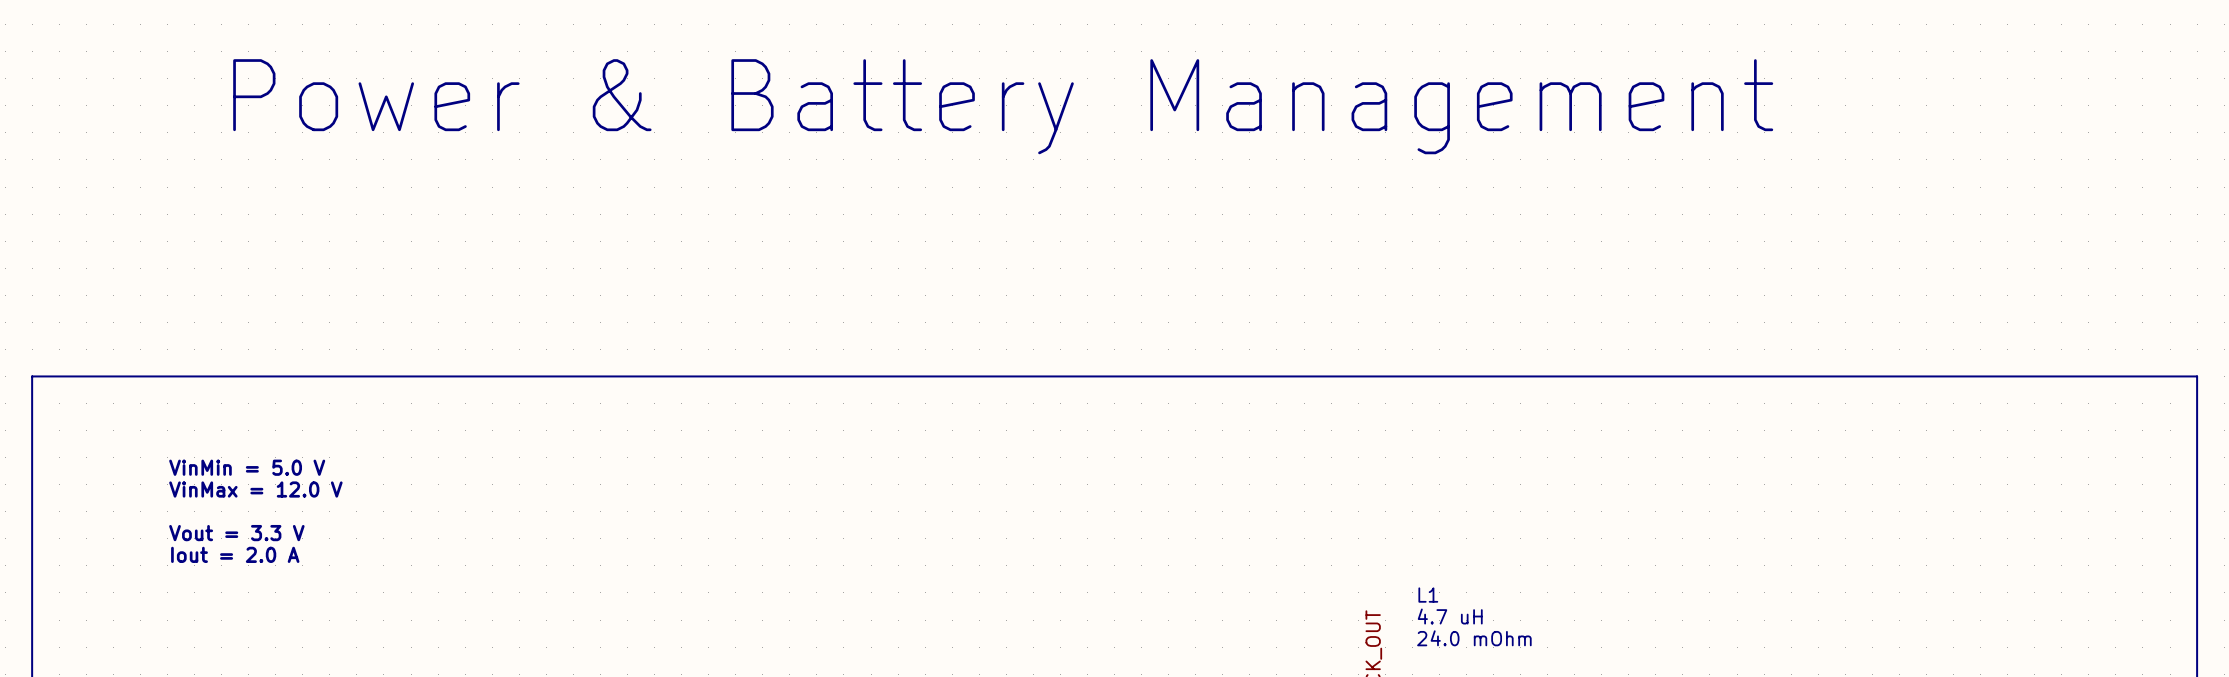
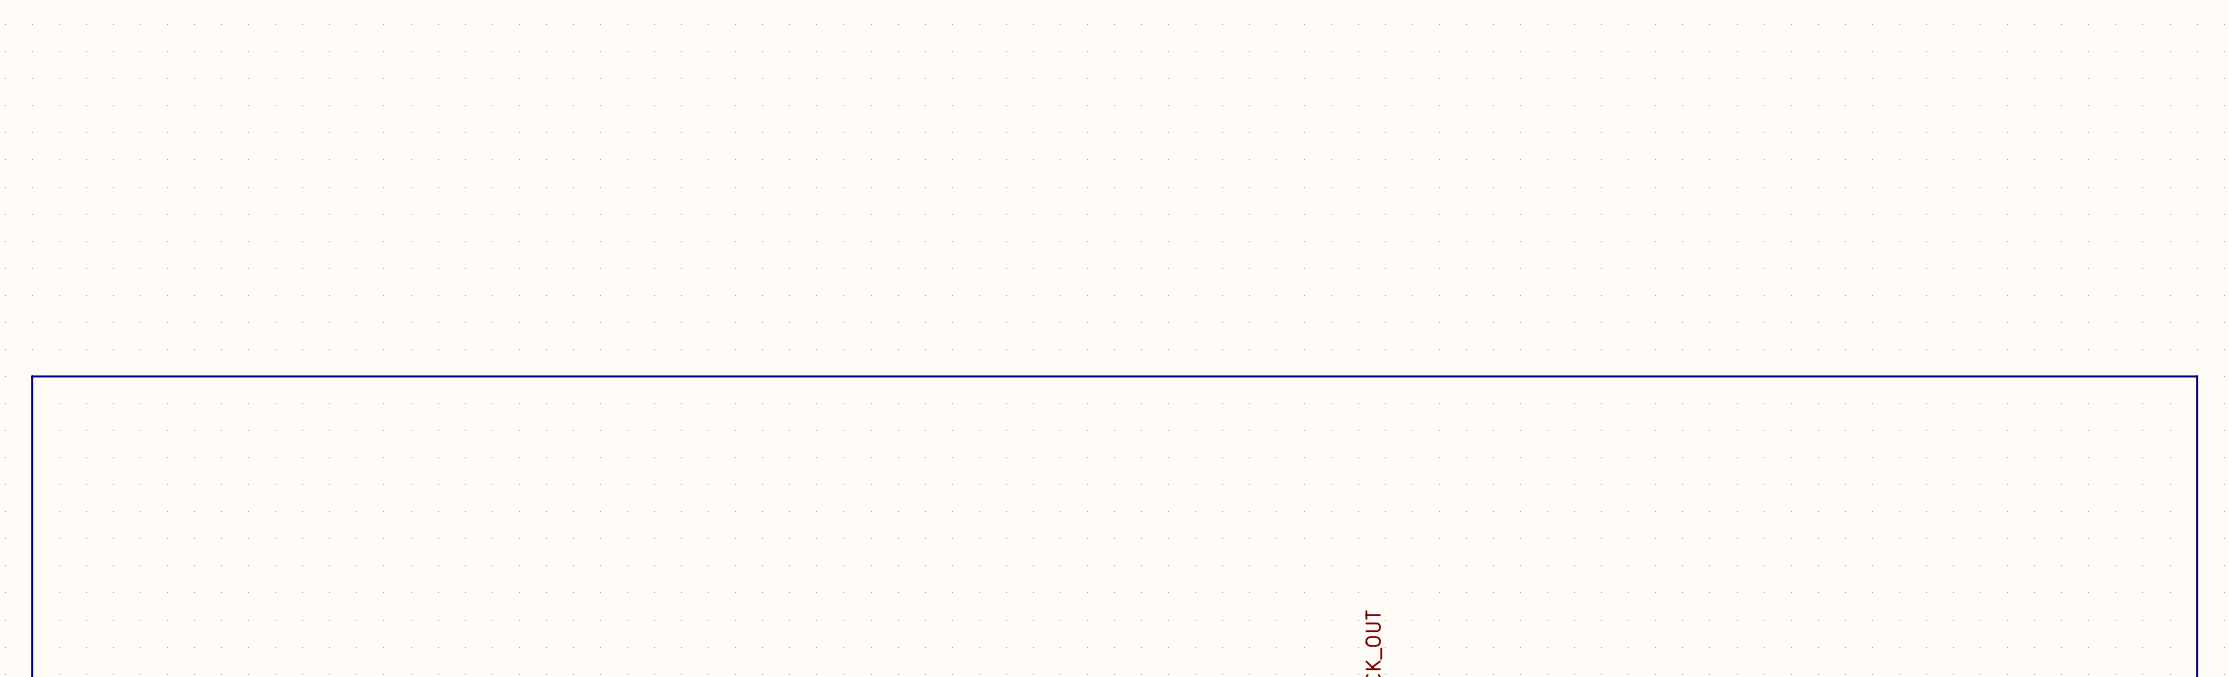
text: Power & Battery Management (1003, 106) -> none
text: VinMin = 5.0 V (247, 467) -> none
text: VinMax = 12.0 V (255, 489) -> none
text: Vout = 3.3 V (236, 533) -> none
text: Iout = 2.0 A (235, 554) -> none
text: L1 (1428, 595) -> none
text: 4.7 uH (1450, 616) -> none
text: 24.0 mOhm (1474, 638) -> none

